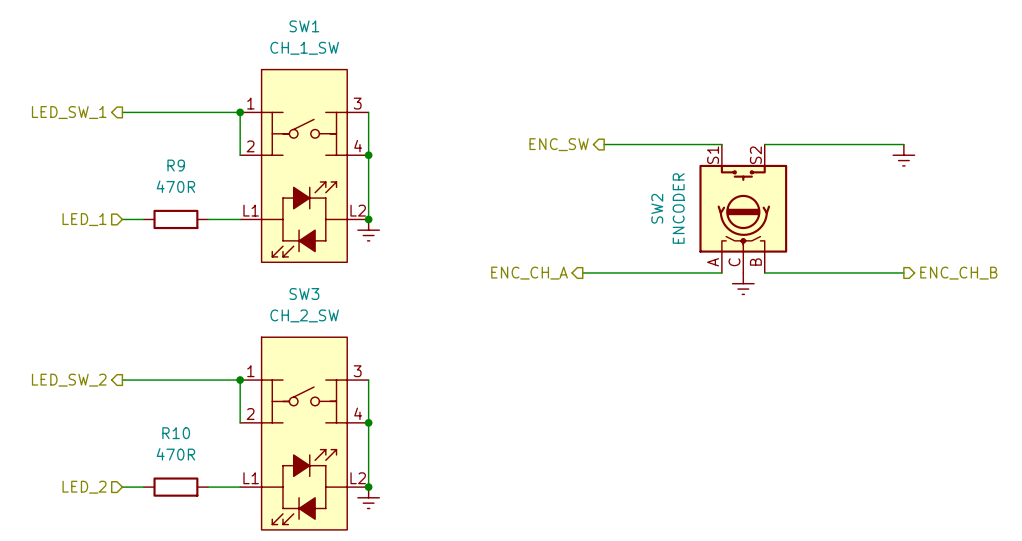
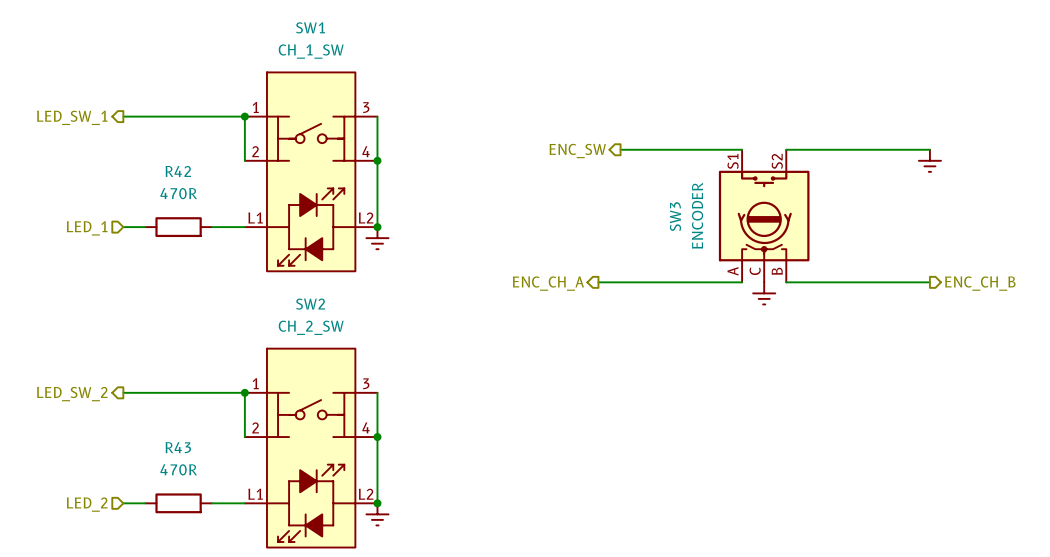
R9 name: R9 (176, 165) -> R42 (178, 171)
SW2 name: SW2 (657, 208) -> SW3 (675, 216)
SW3 name: SW3 (304, 294) -> SW2 (310, 304)
R10 name: R10 (176, 433) -> R43 (178, 447)

